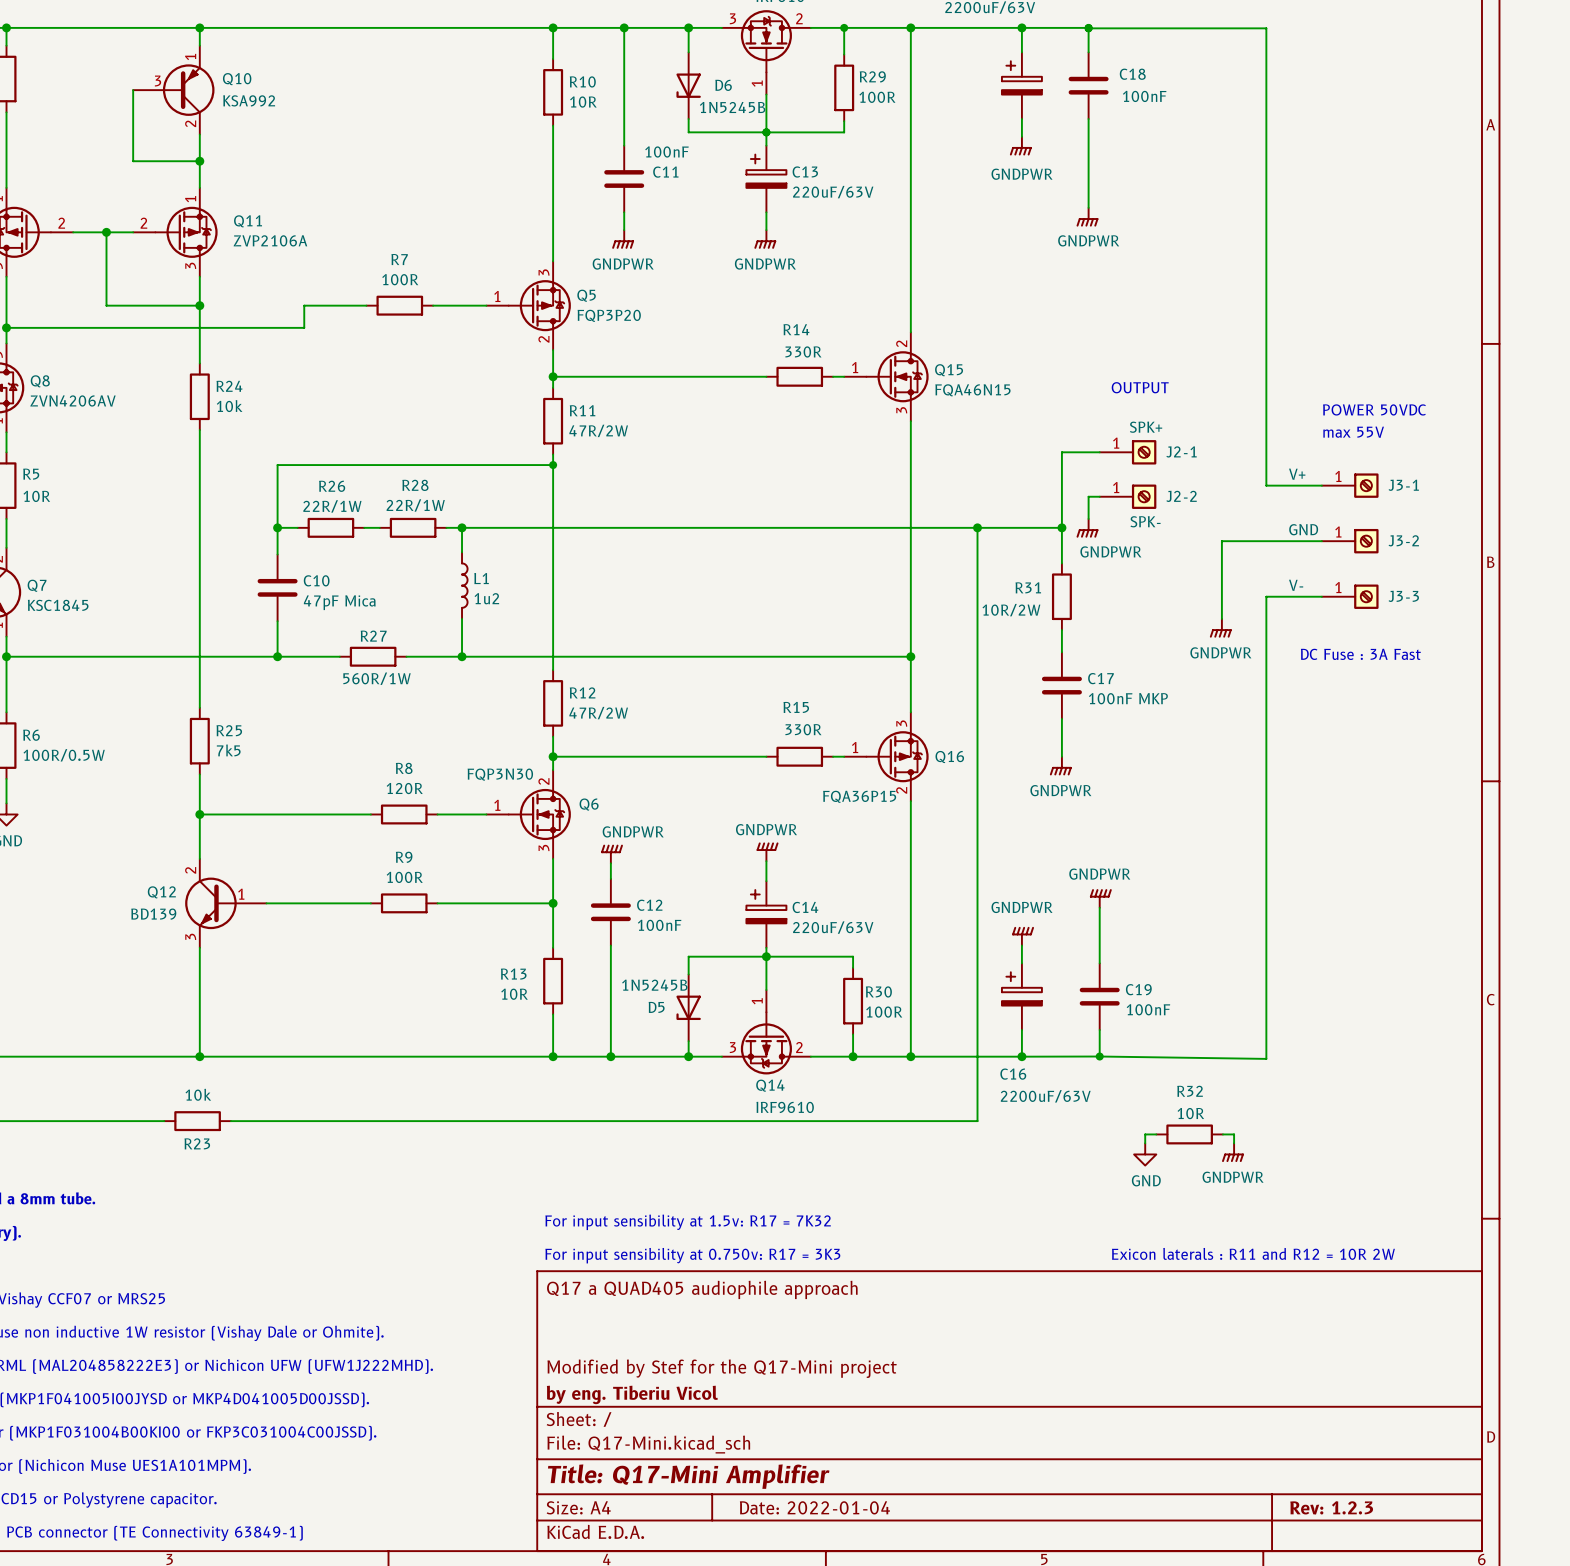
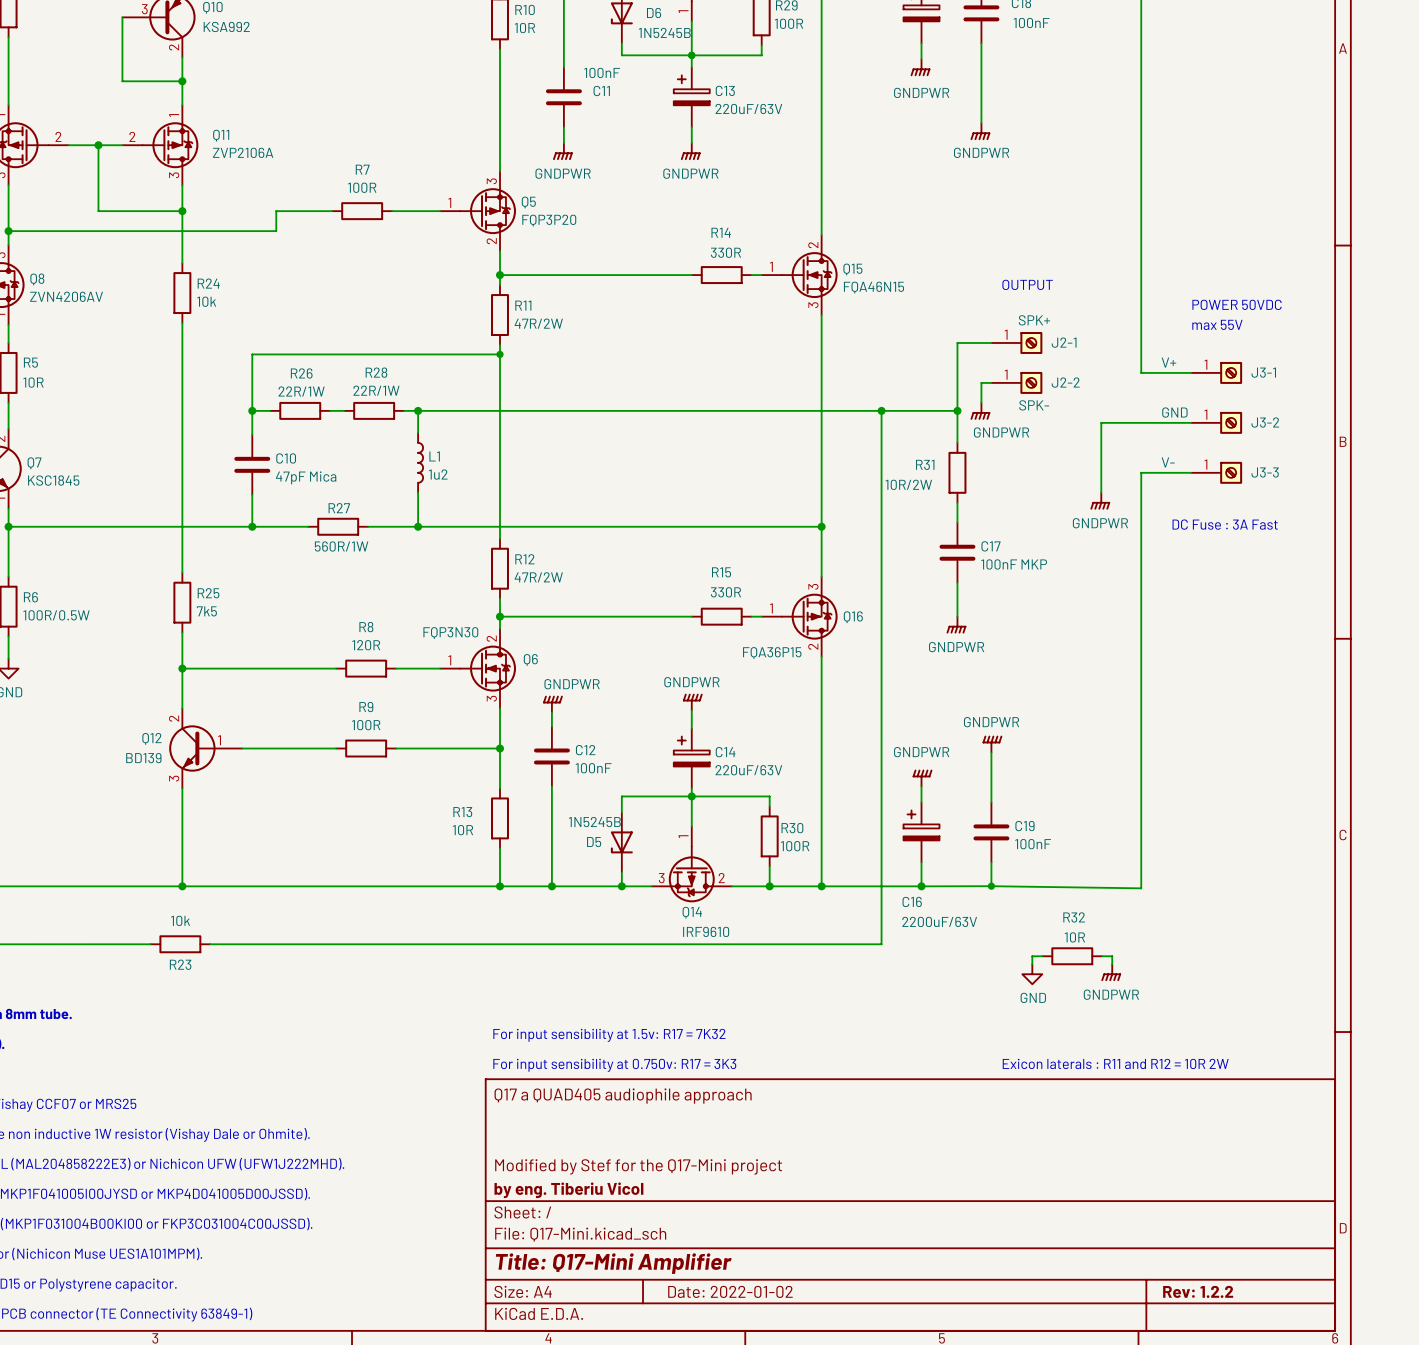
title block: Date: 2022-01-04 (814, 1507) -> Date: 2022-01-02 (730, 1291)
title block: Rev: 1.2.3 (1331, 1507) -> Rev: 1.2.2 (1198, 1291)

